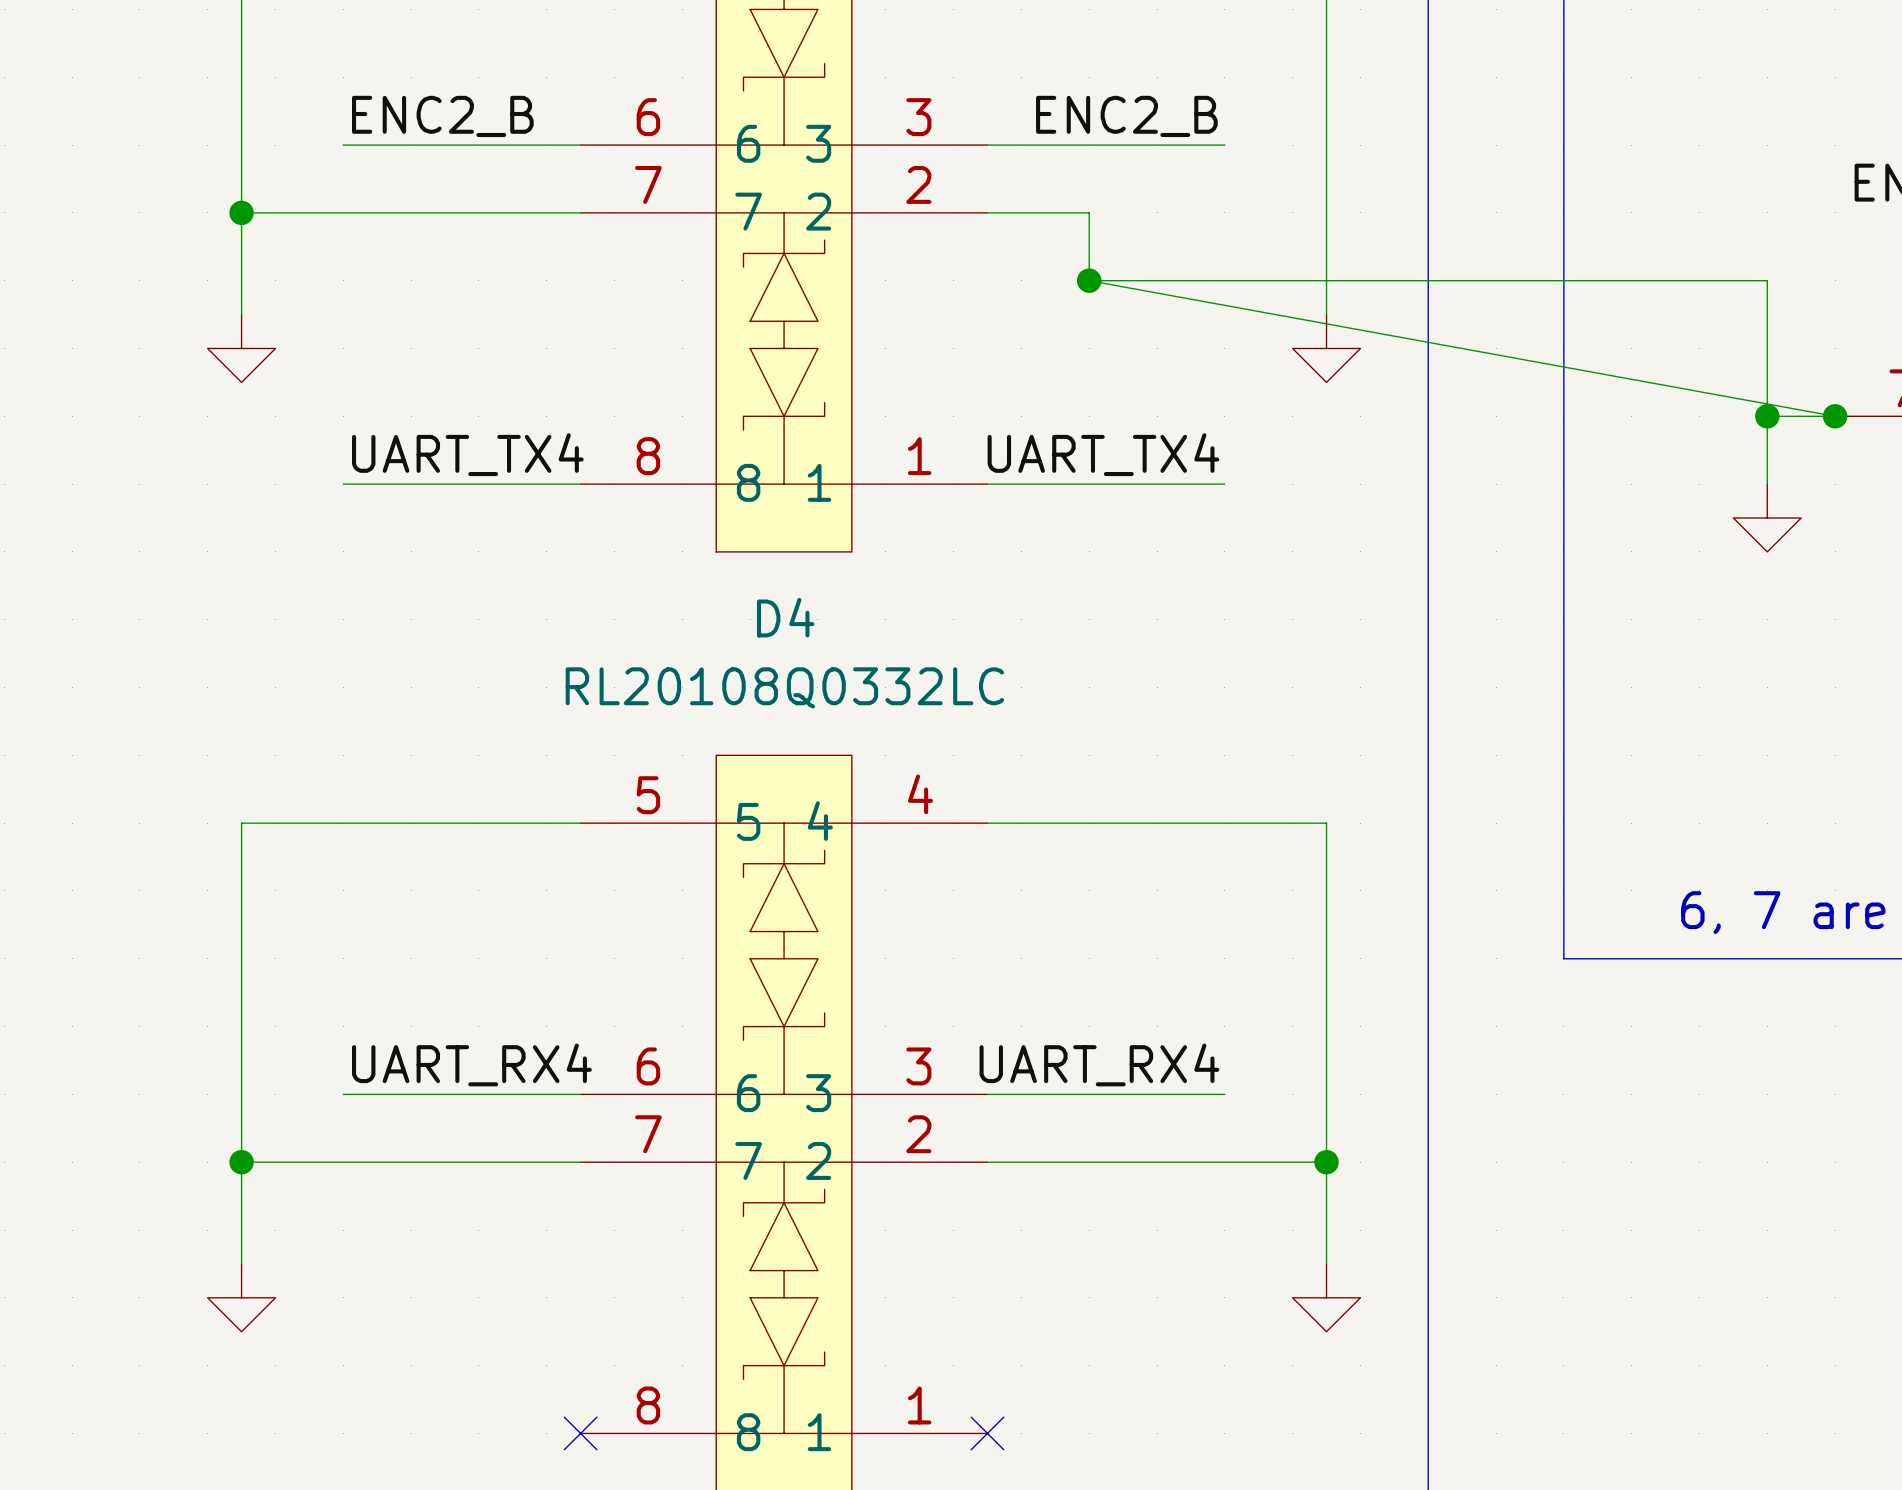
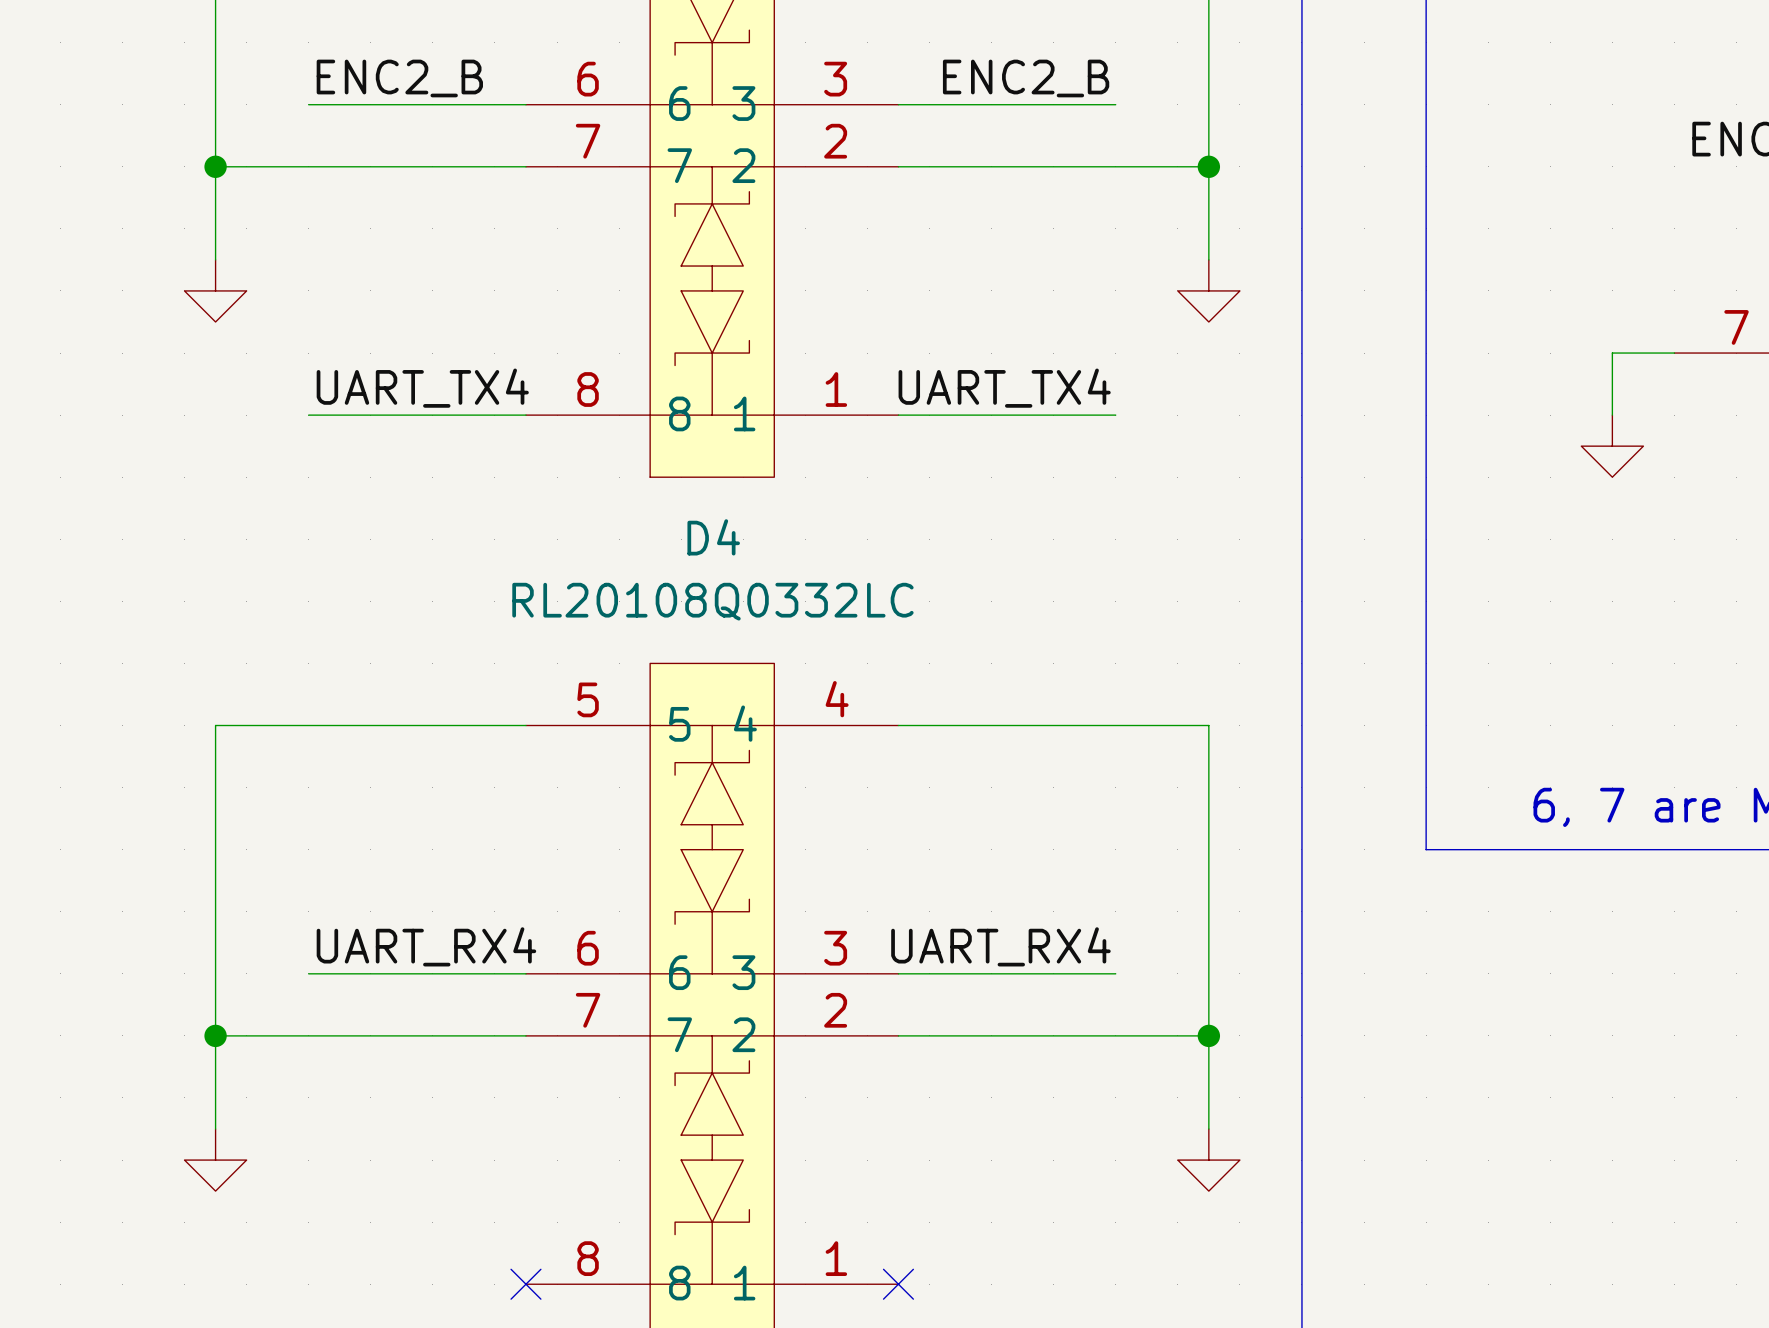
wire: (1089, 212) (1089, 280) -> (991, 166) (1208, 166)
junction: none -> (1208, 166)
wire: (1089, 280) (1767, 280) (1767, 416) -> none
wire: (1089, 280) (1835, 416) -> none
junction: (1089, 280) -> none
junction: (1767, 416) -> none
junction: (1835, 416) -> none

